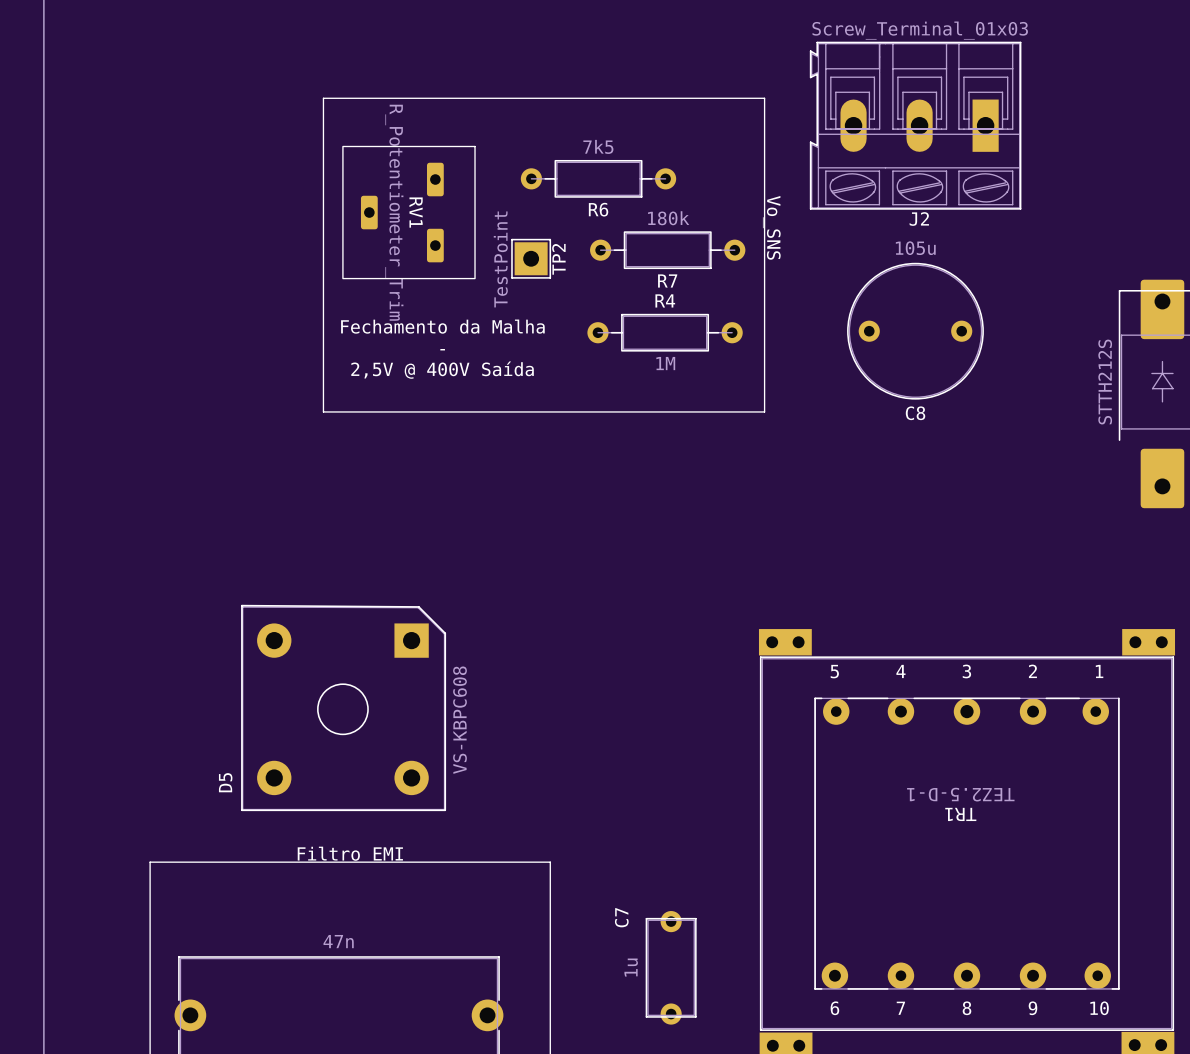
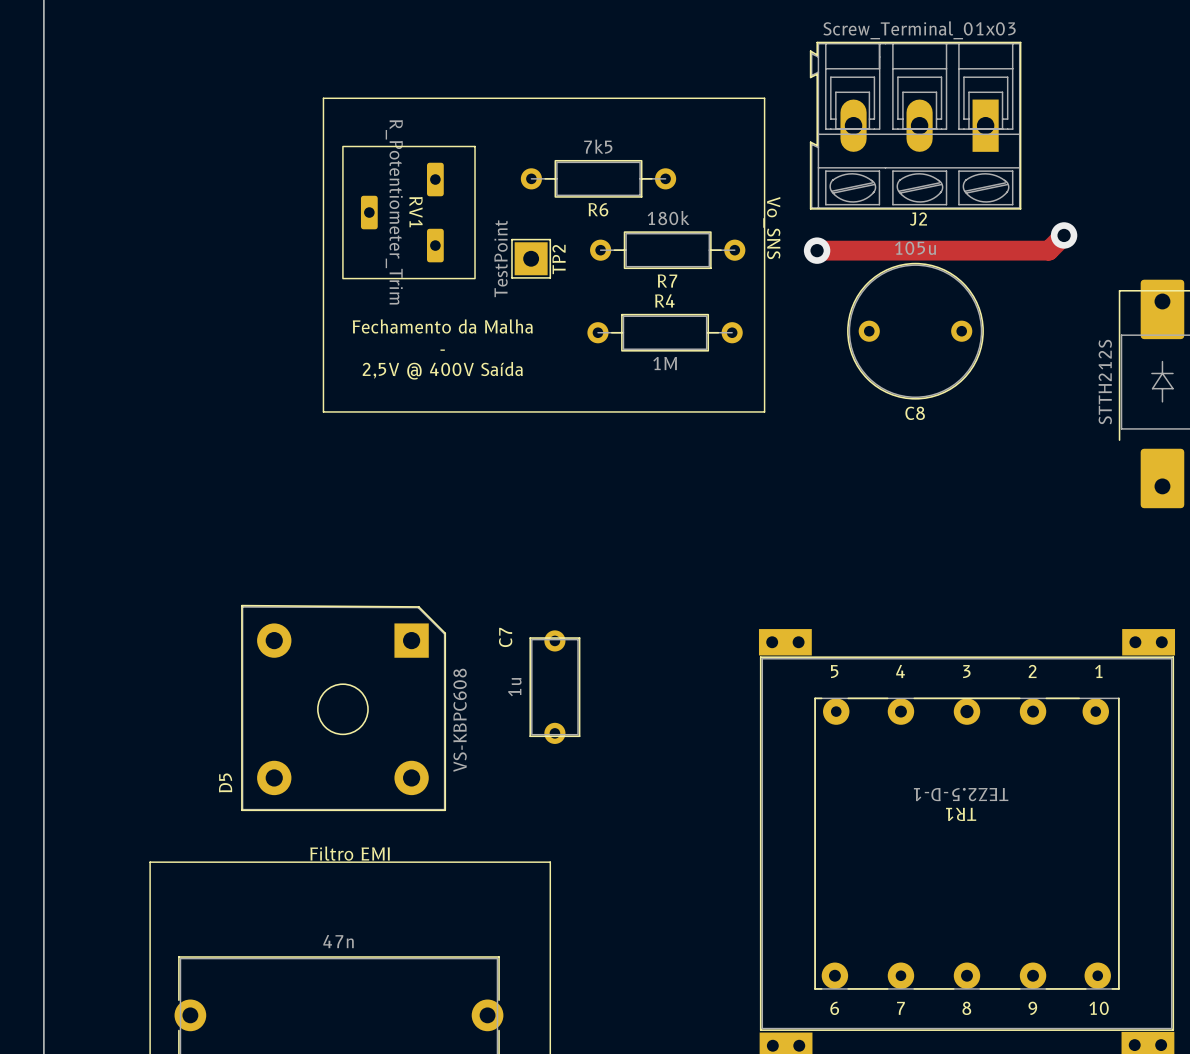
track: none -> (1064, 235) (1048, 250) (817, 250)
via: none -> (1064, 235)
via: none -> (817, 250)
C7 position: (671, 967) -> (554, 687)

